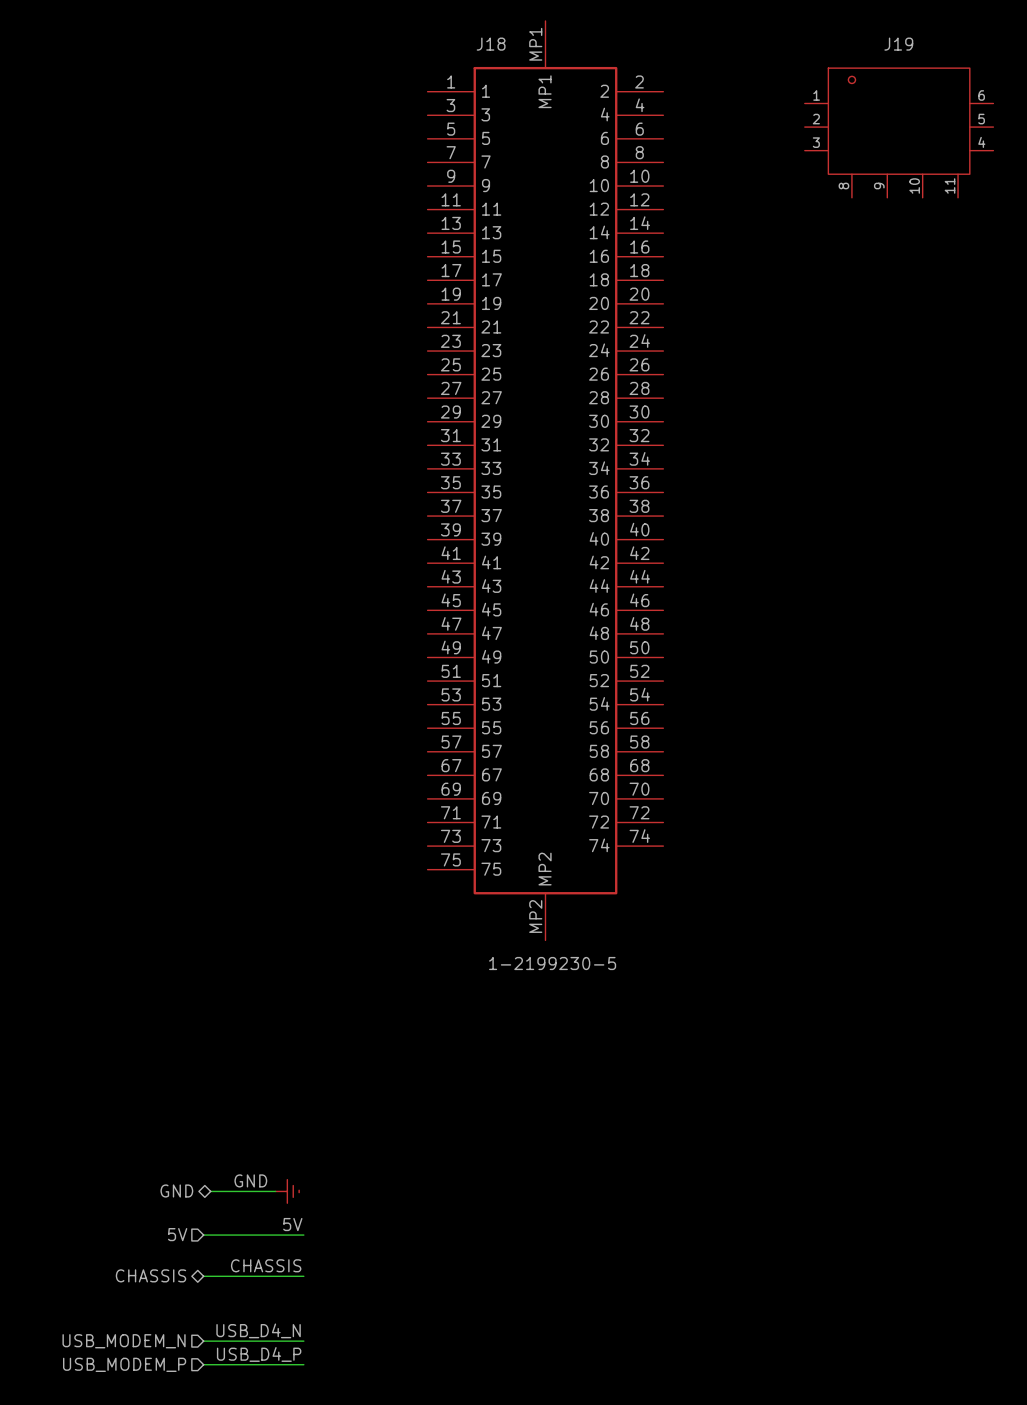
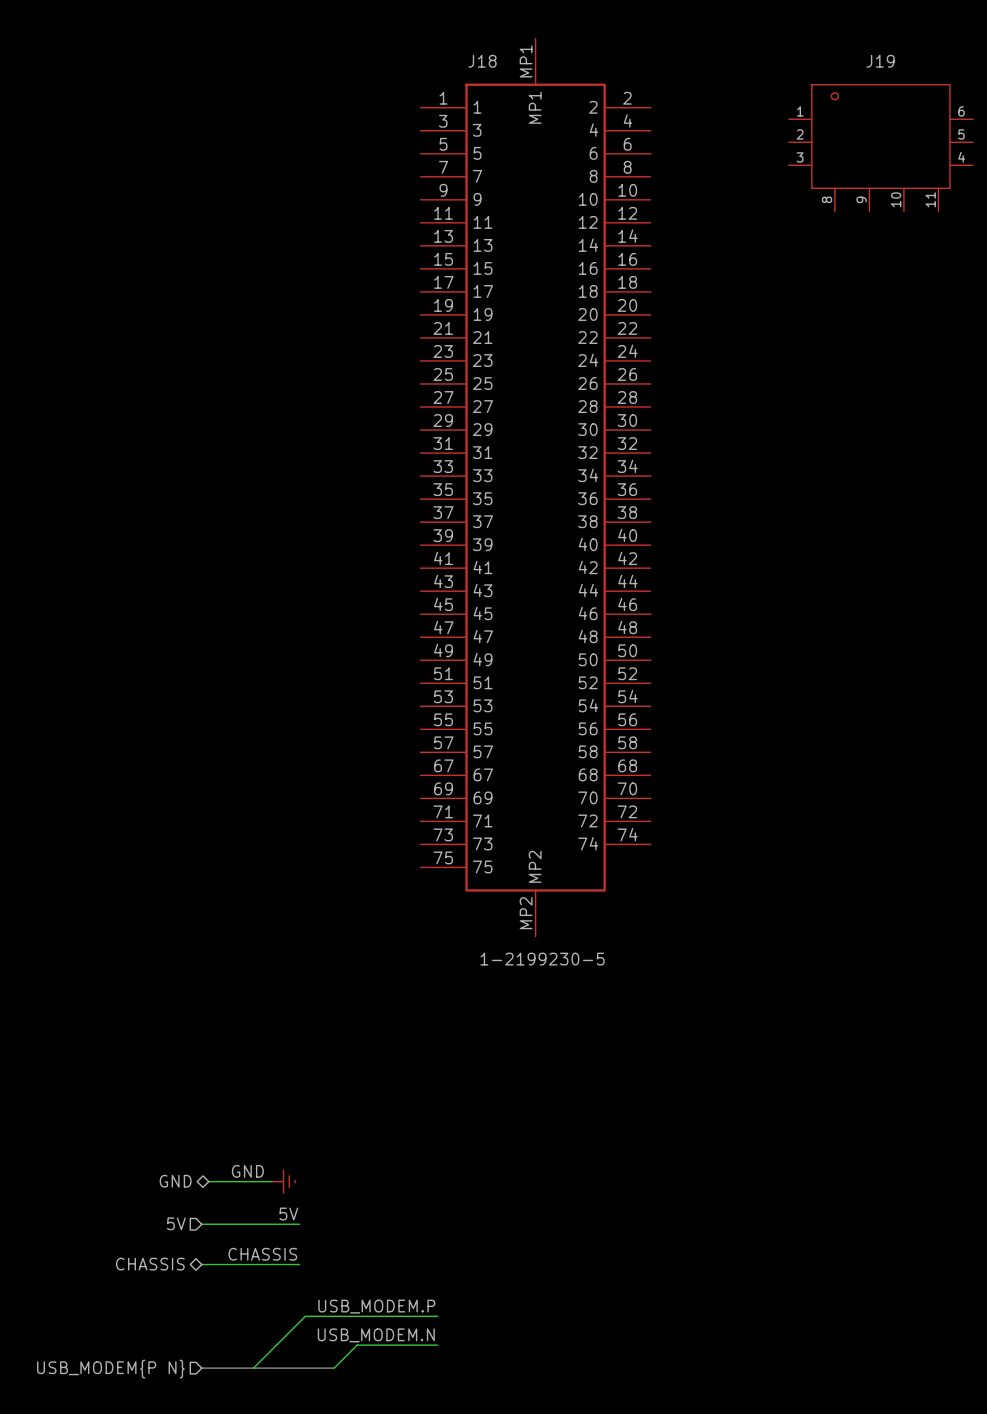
label: none -> USB_MODEM.P (376, 1306)
wire: none -> (437, 1316) (305, 1316) (253, 1368)
label: USB_D4_N (258, 1330) -> USB_MODEM.N (376, 1335)
hierarchical label: USB_MODEM_N (124, 1341) -> none
wire: (203, 1341) (303, 1341) -> none
label: USB_D4_P (259, 1354) -> none
wire: none -> (437, 1345) (357, 1345) (334, 1368)
hierarchical label: USB_MODEM_P (124, 1364) -> USB_MODEM{P N} (110, 1369)
wire: (203, 1364) (303, 1364) -> none
bus: none -> (201, 1368) (334, 1368)

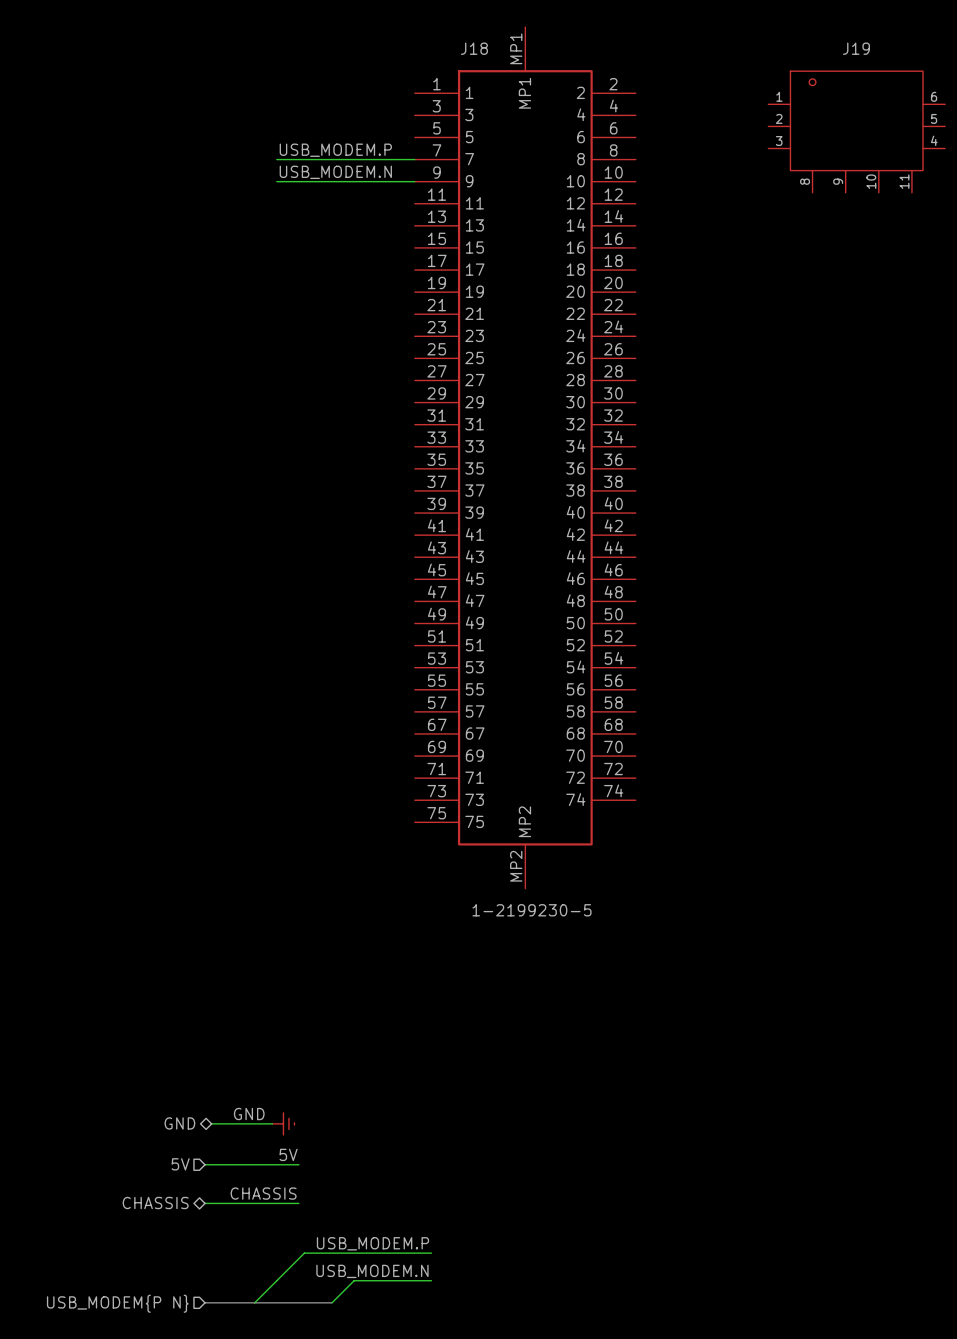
label: none -> USB_MODEM.P (335, 150)
wire: none -> (276, 159) (414, 159)
label: none -> USB_MODEM.N (335, 172)
wire: none -> (276, 181) (414, 181)

